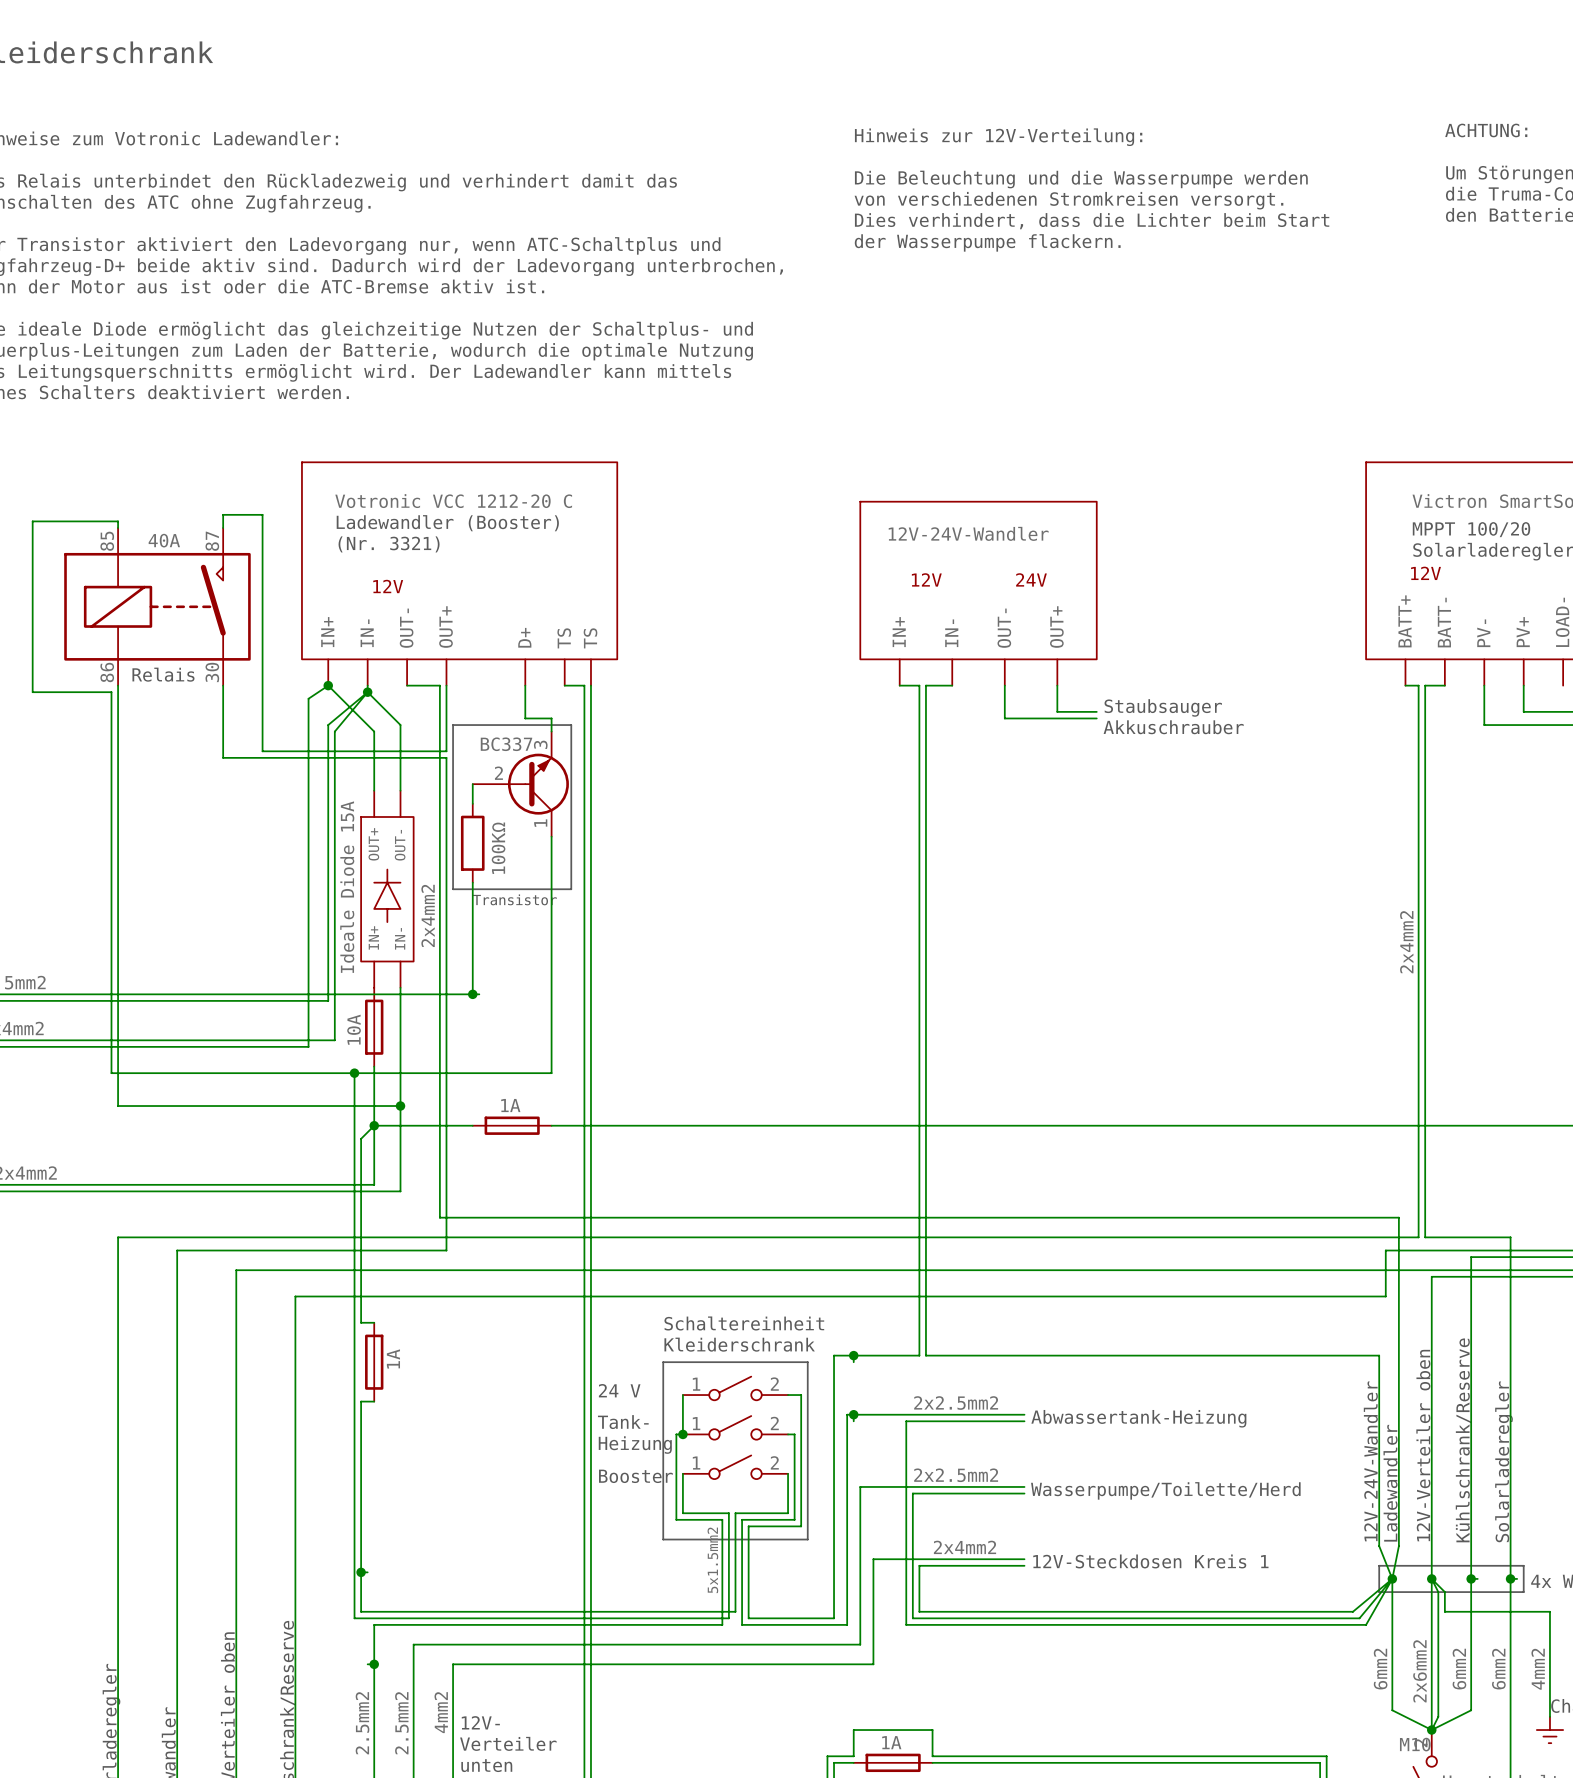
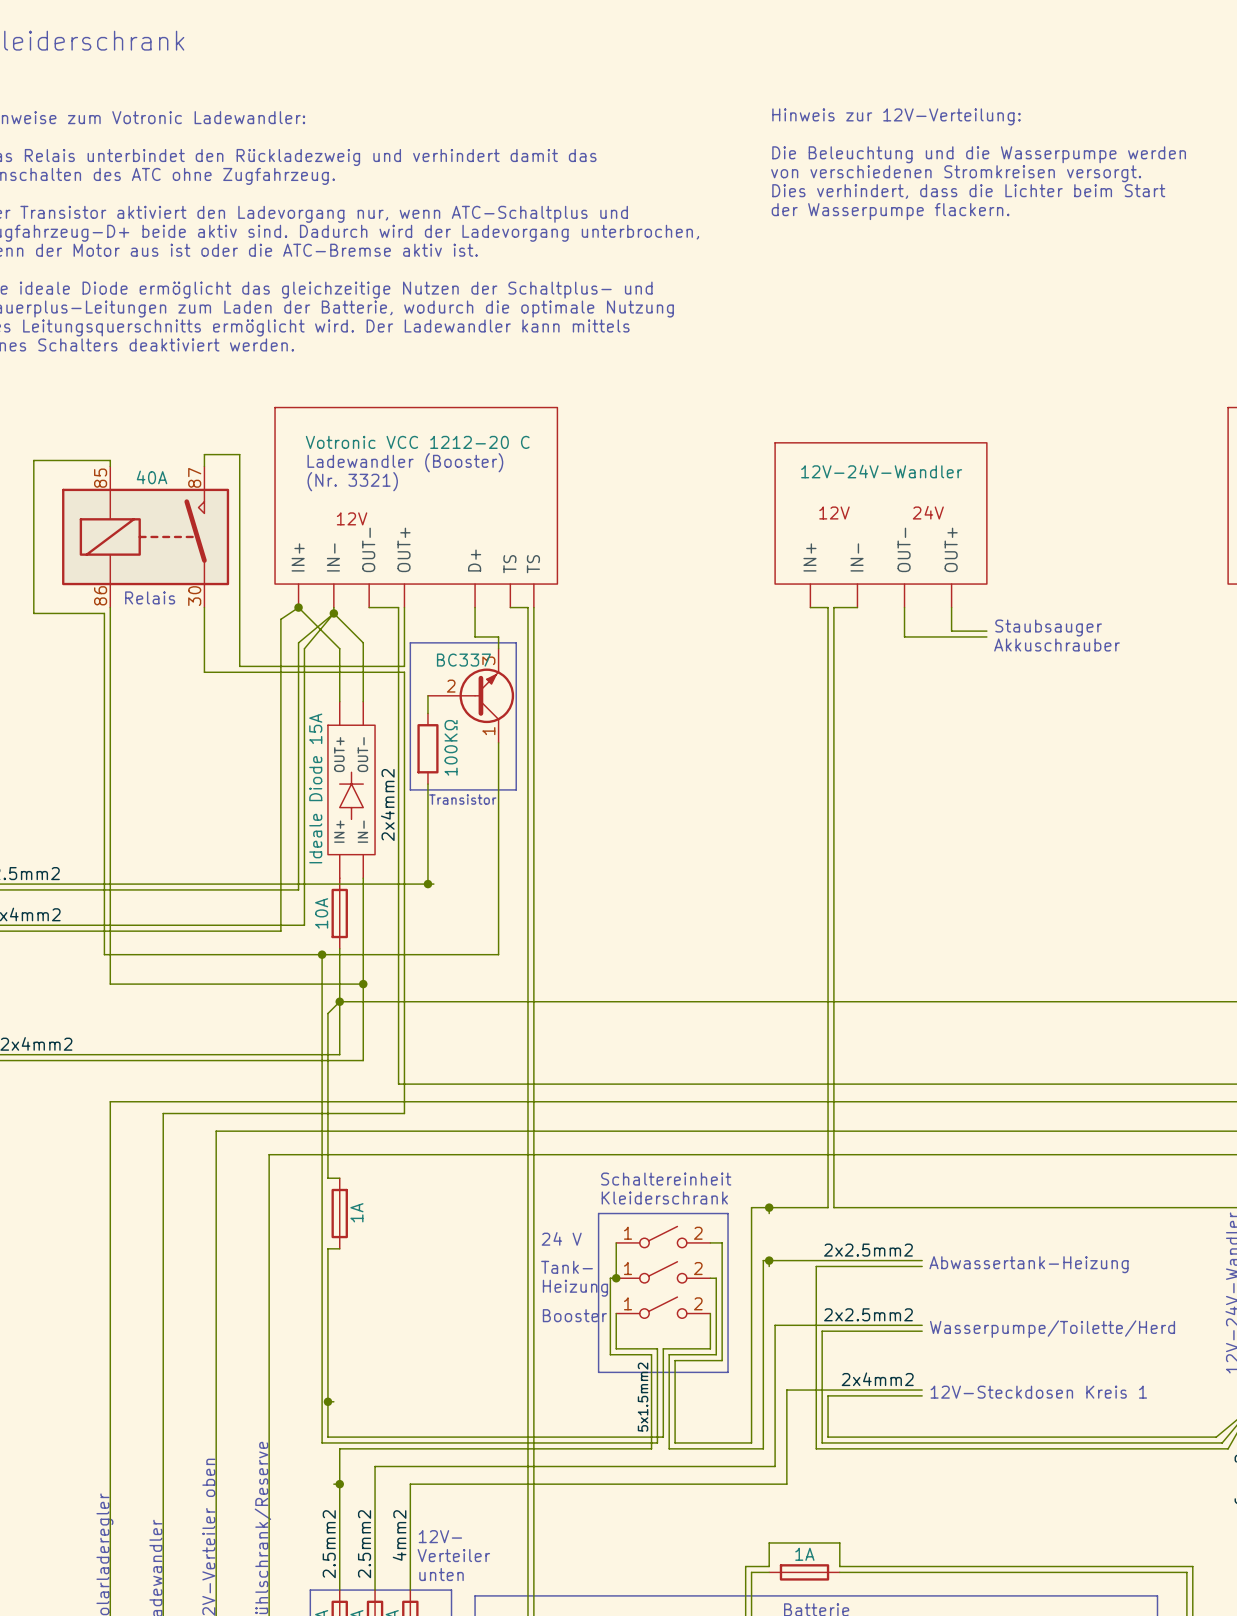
part: 1A (512, 1125) -> none

